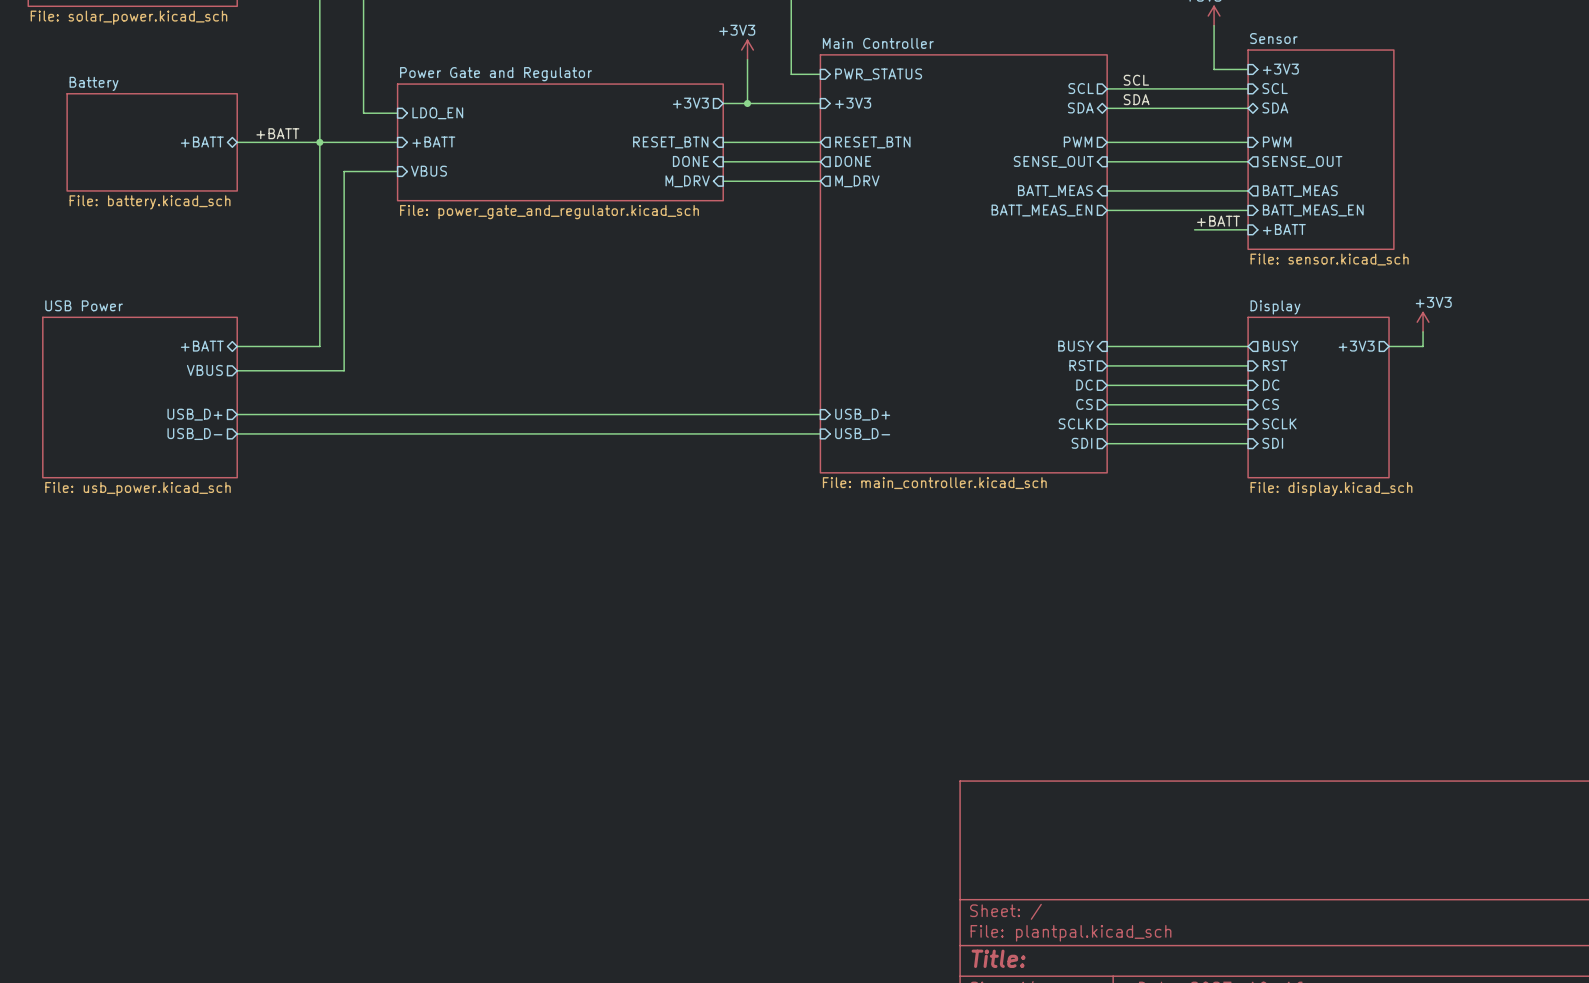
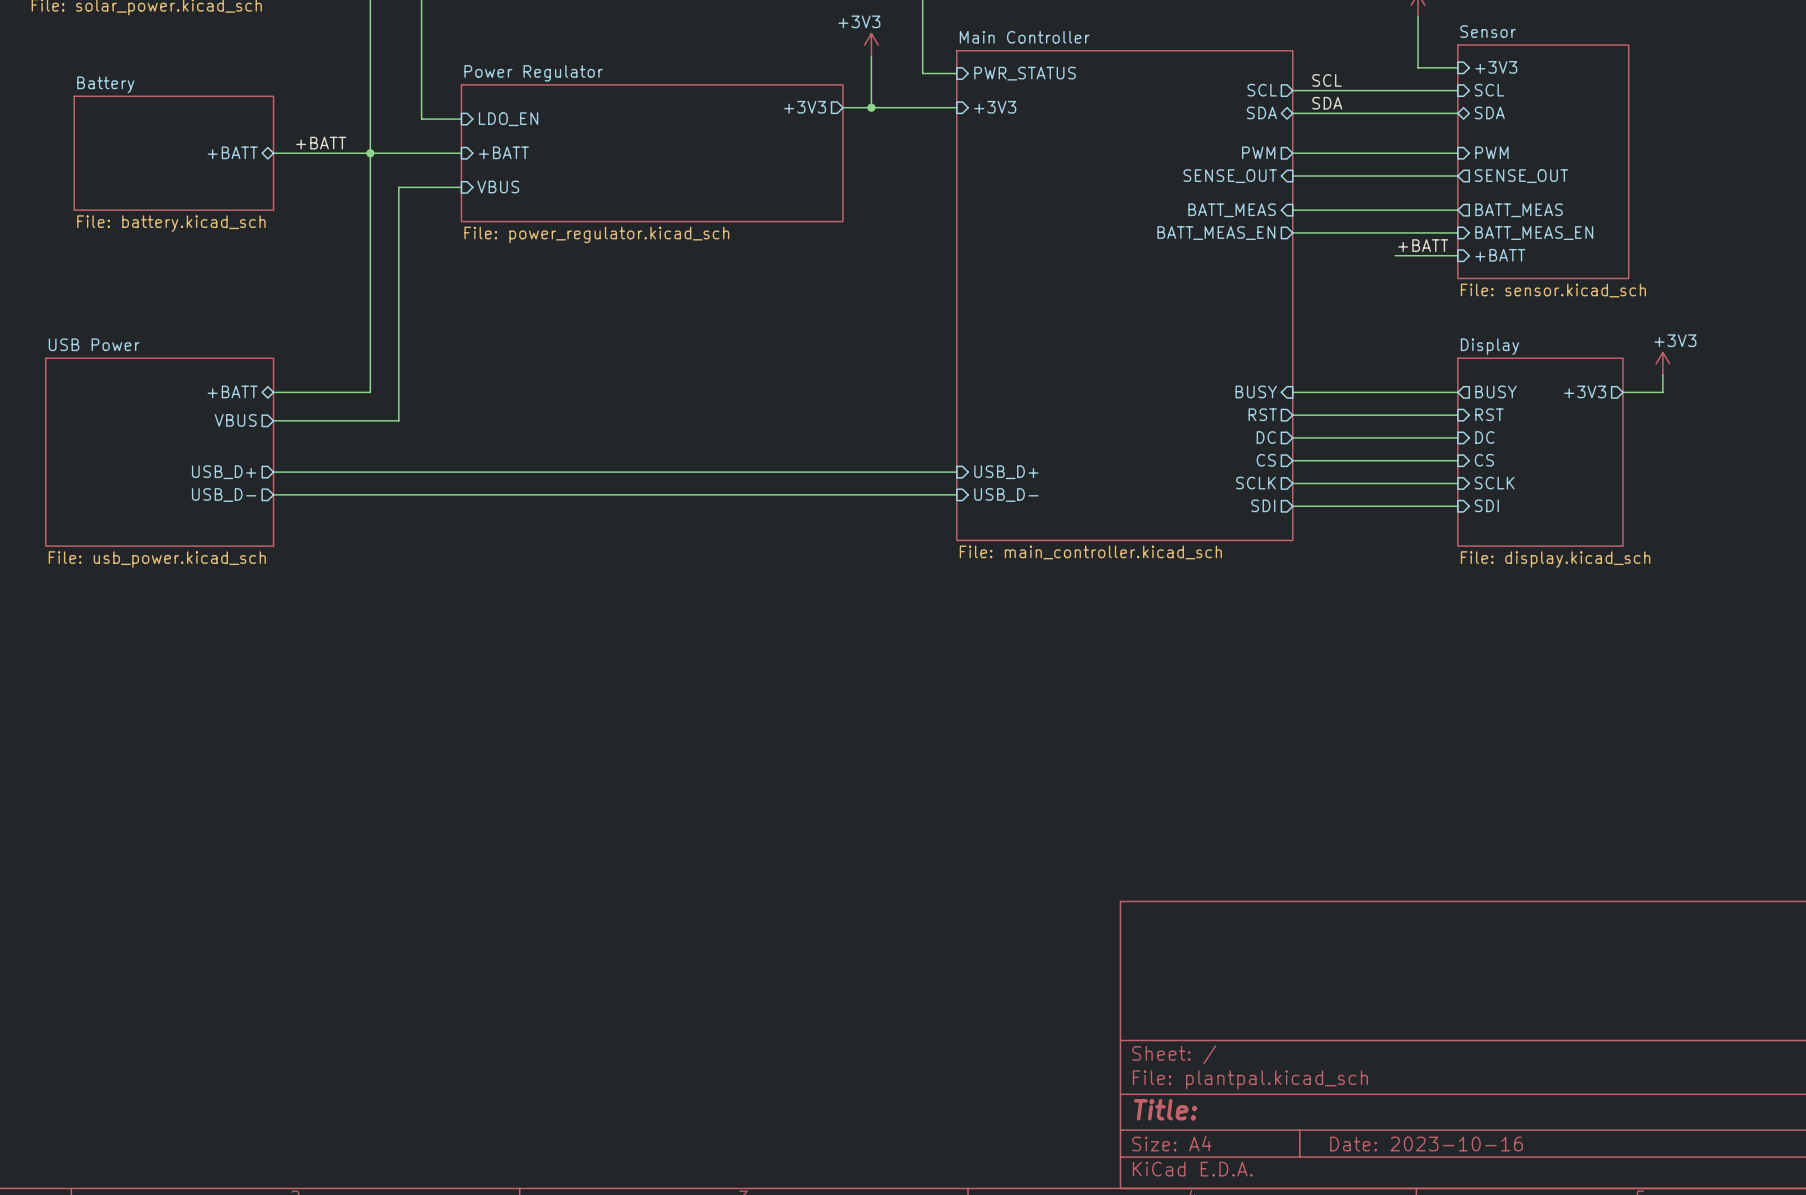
sheet Power Gate and Regulator name: Power Gate and Regulator (496, 74) -> Power Regulator (533, 73)
sheet pin: RESET_BTN (670, 142) -> none
wire: (723, 142) (820, 142) -> none
sheet pin: RESET_BTN (872, 142) -> none
sheet pin: DONE (690, 161) -> none
wire: (723, 161) (820, 161) -> none
sheet pin: DONE (853, 161) -> none
sheet pin: M_DRV (687, 181) -> none
wire: (723, 181) (820, 181) -> none
sheet pin: M_DRV (857, 181) -> none
sheet Power Gate and Regulator value: File: power_gate_and_regulator.kicad_sch (549, 212) -> File: power_regulator.kicad_sch (596, 234)

